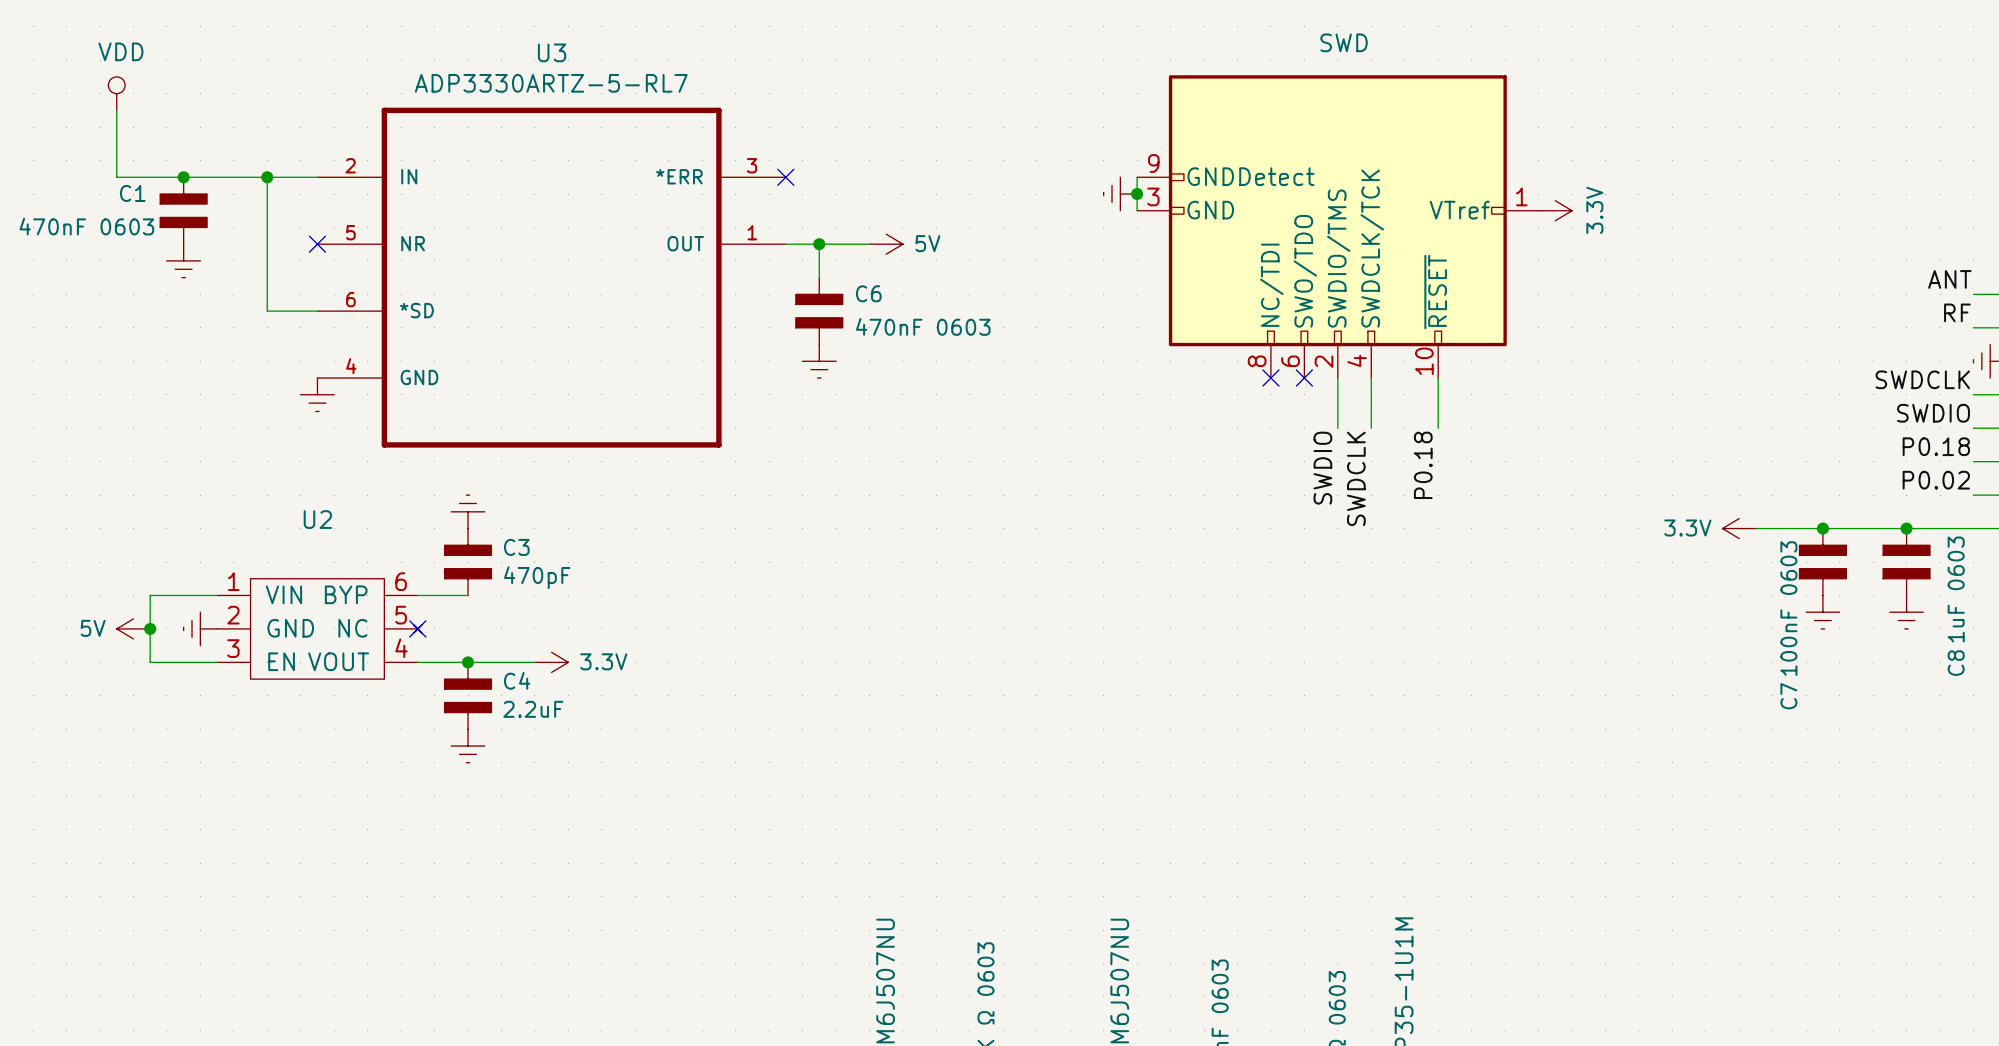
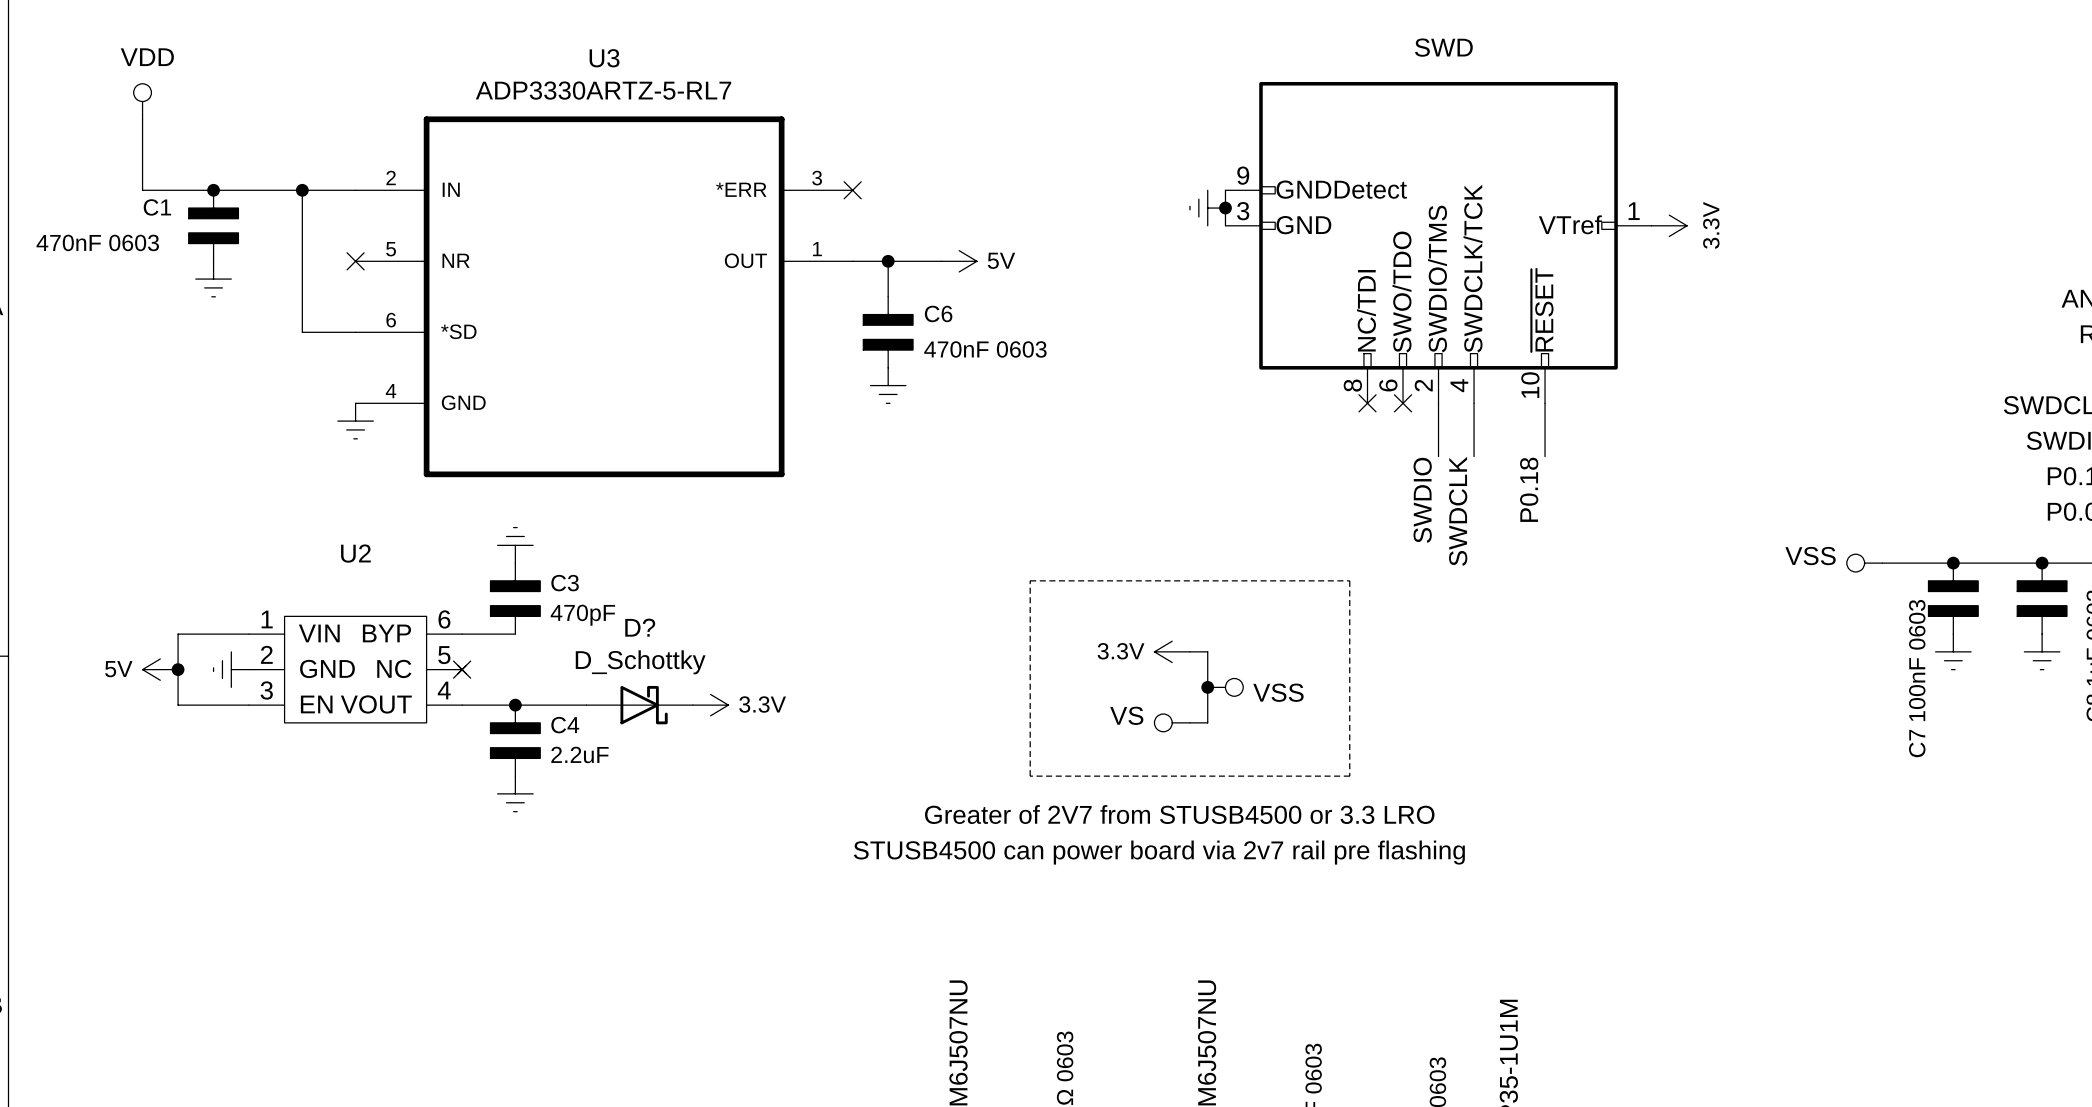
power symbol: 3.3V (1739, 528) -> VSS (1864, 563)
line: none -> (1030, 580) (1349, 580) (1349, 776) (1030, 776) (1030, 580)
power symbol: none -> 3.3V (1172, 651)
wire: none -> (1189, 651) (1207, 651) (1207, 722) (1189, 722)
junction: none -> (1207, 687)
power symbol: none -> VSS (1225, 687)
power symbol position: 3.3V (551, 662) -> 3.3V (710, 705)
D?: none -> D_Schottky (639, 705)
power symbol: none -> VS (1172, 722)
text: none -> Greater of 2V7 from STUSB4500 or 3.3 LRO (1179, 814)
text: none -> STUSB4500 can power board via 2v7 rail pre flashing (1159, 852)

